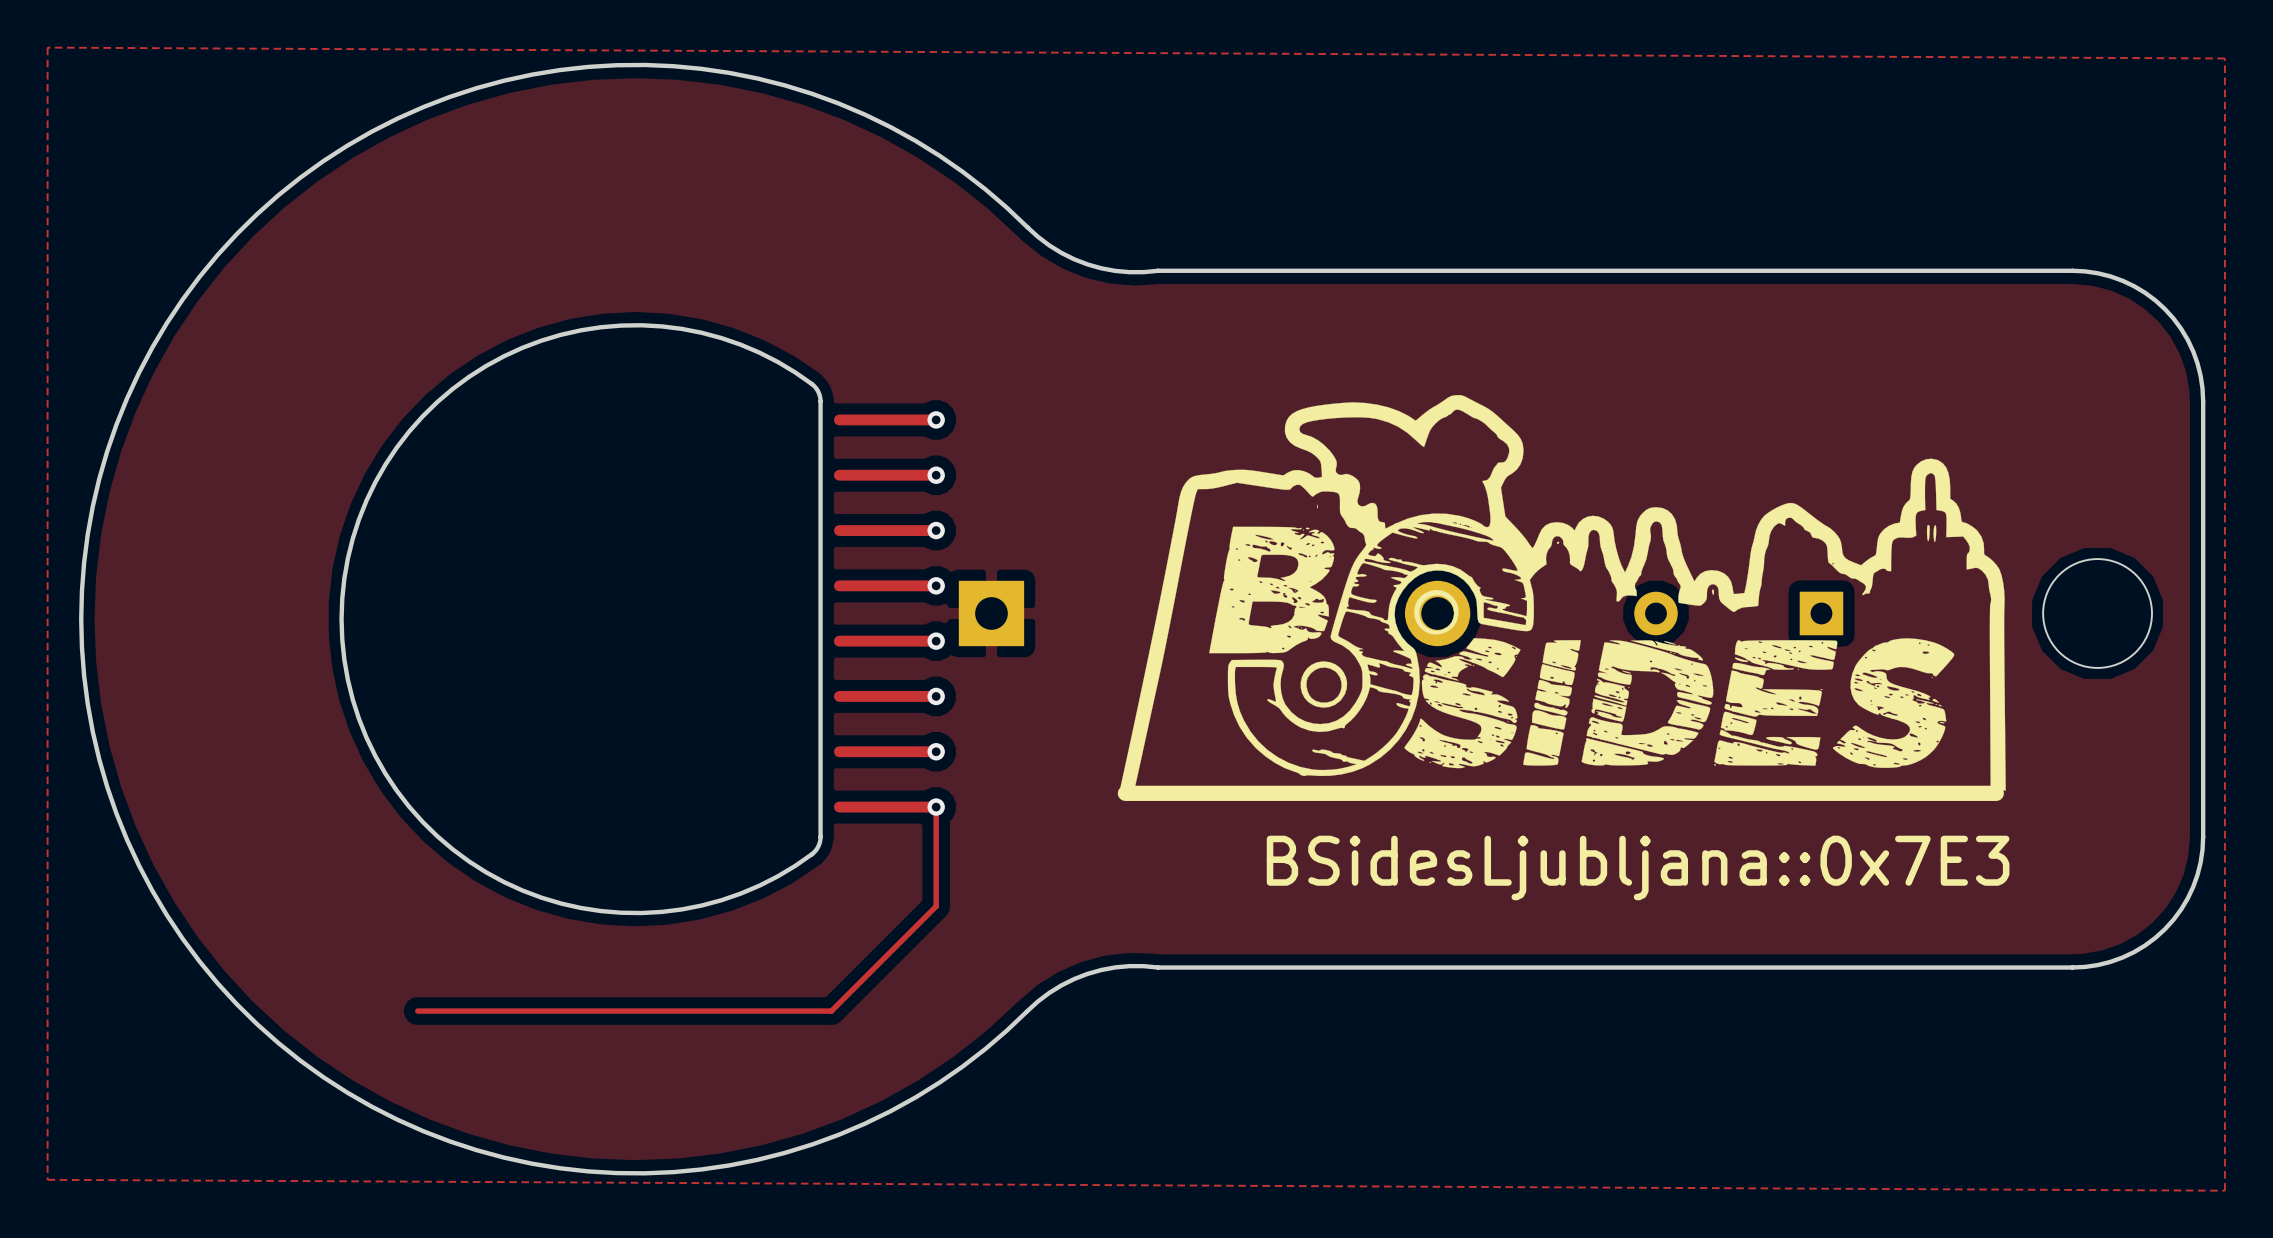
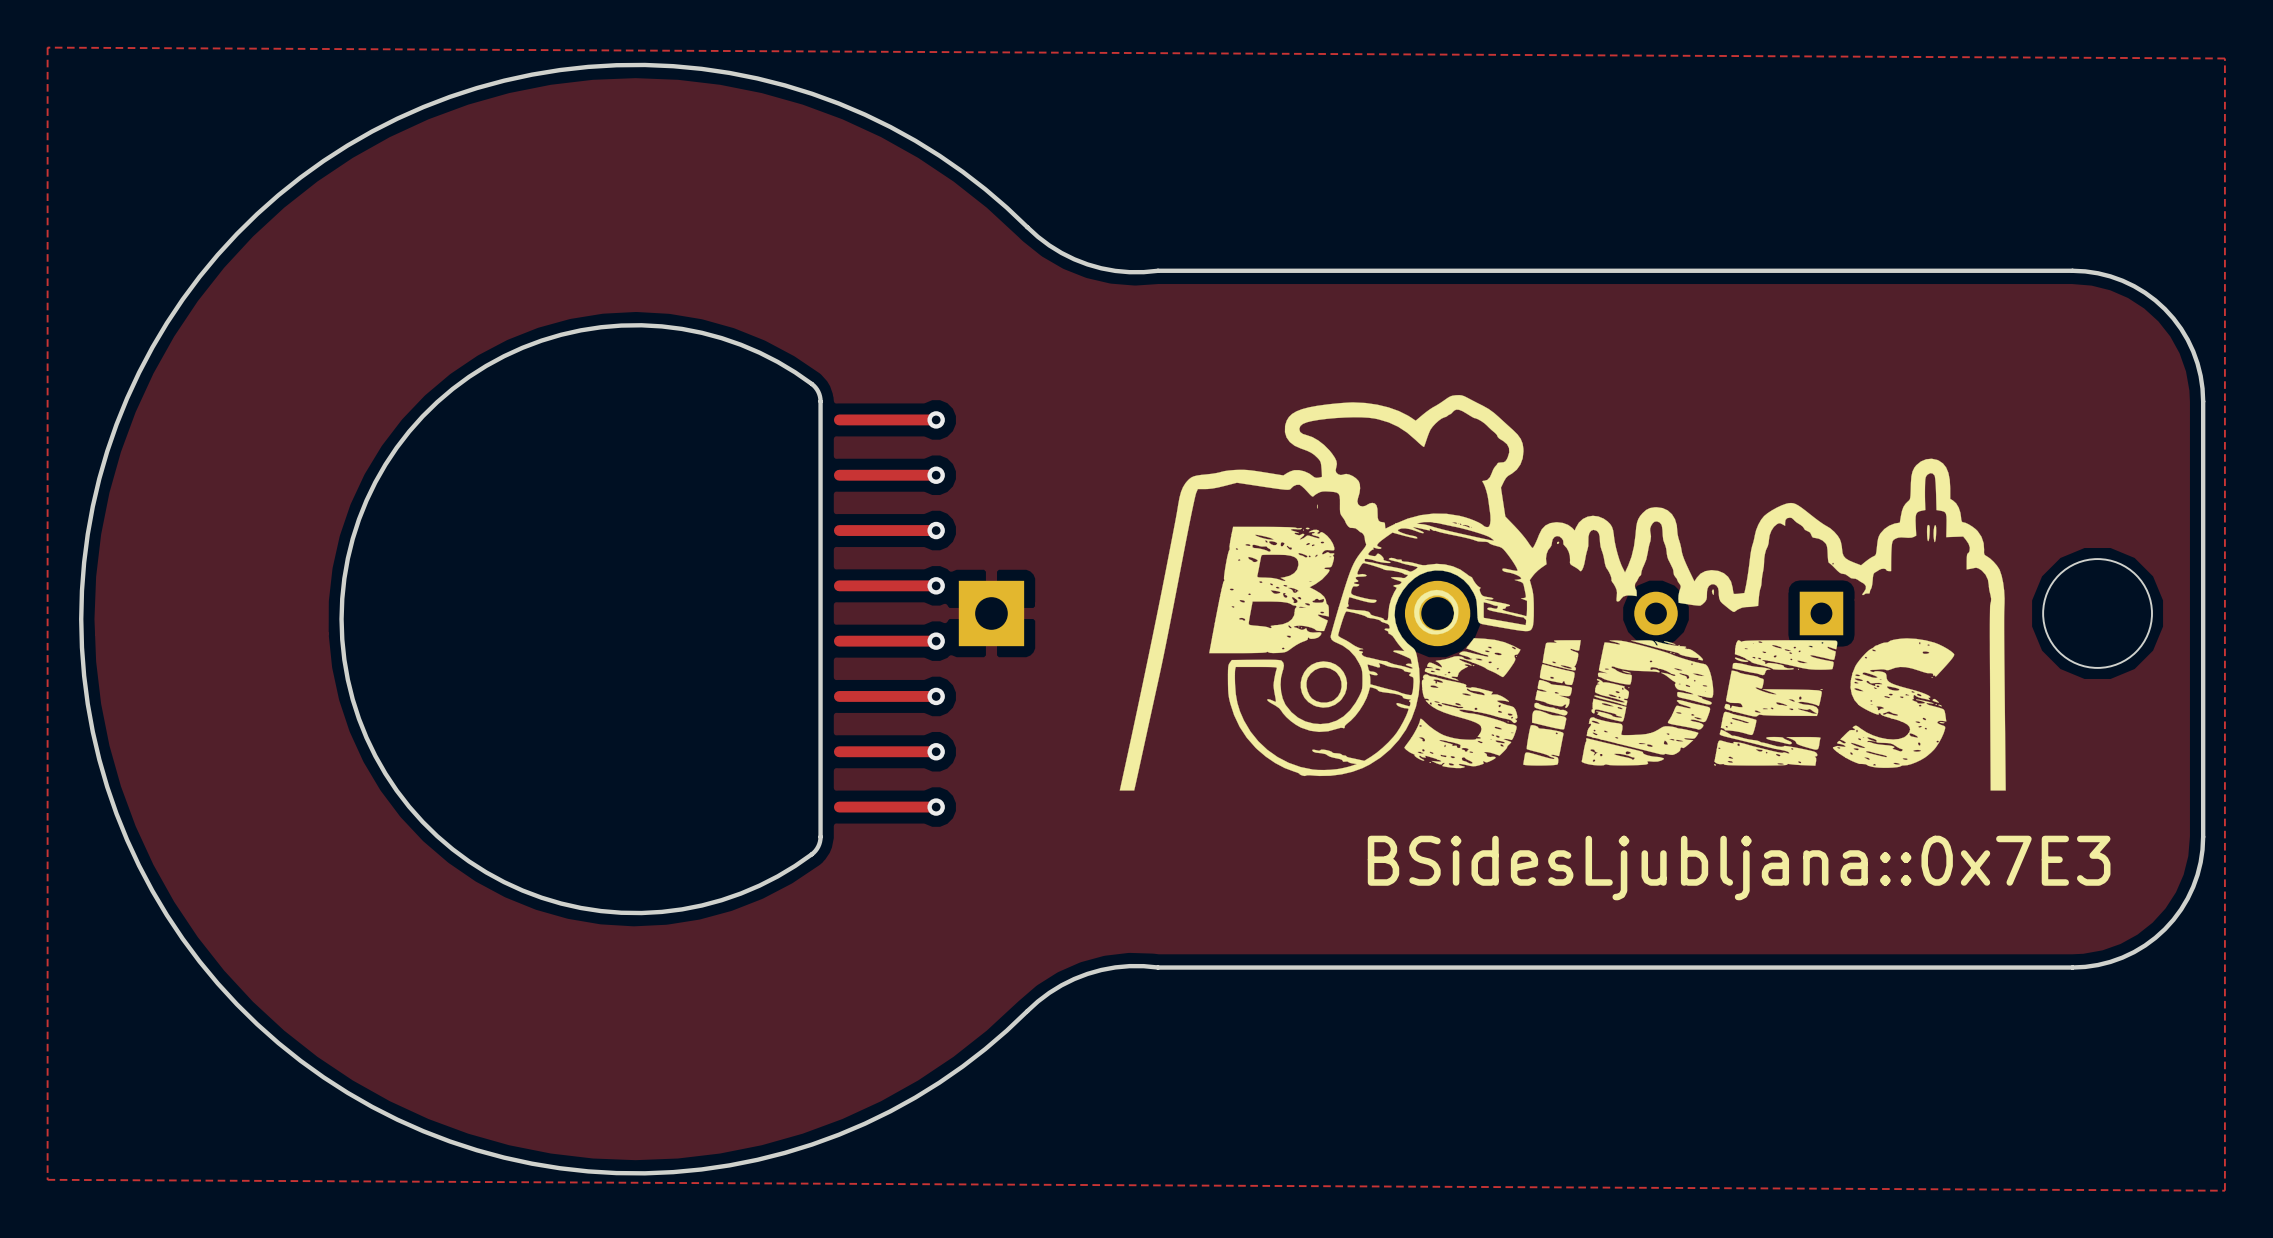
line: (1125, 793) (1996, 793) -> none
track: (936, 807) (936, 906) (831, 1011) (417, 1011) -> none
text position: BSidesLjubljana::0x7E3 (1638, 867) -> BSidesLjubljana::0x7E3 (1739, 867)

